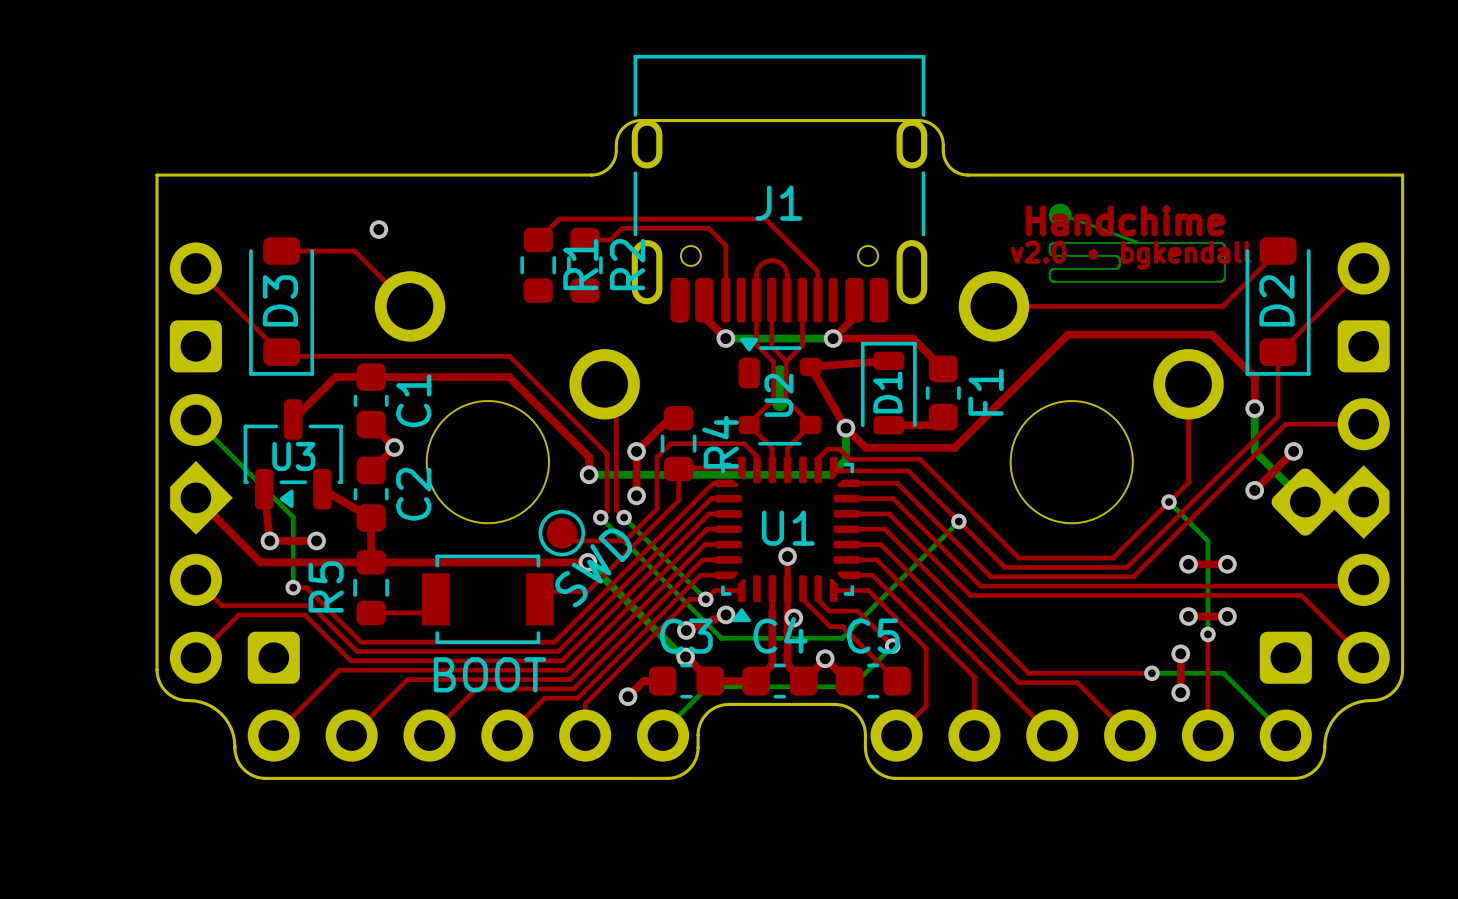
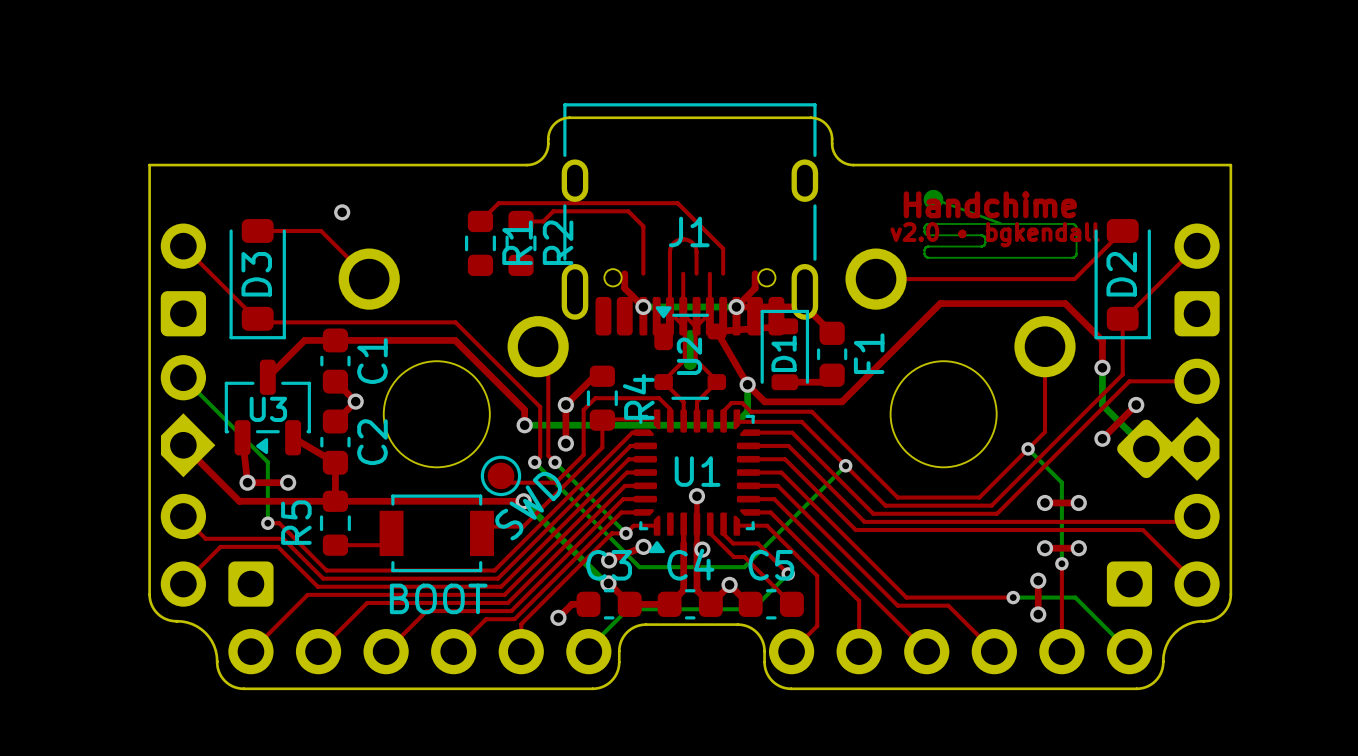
J1 position: (779, 188) -> (689, 219)

